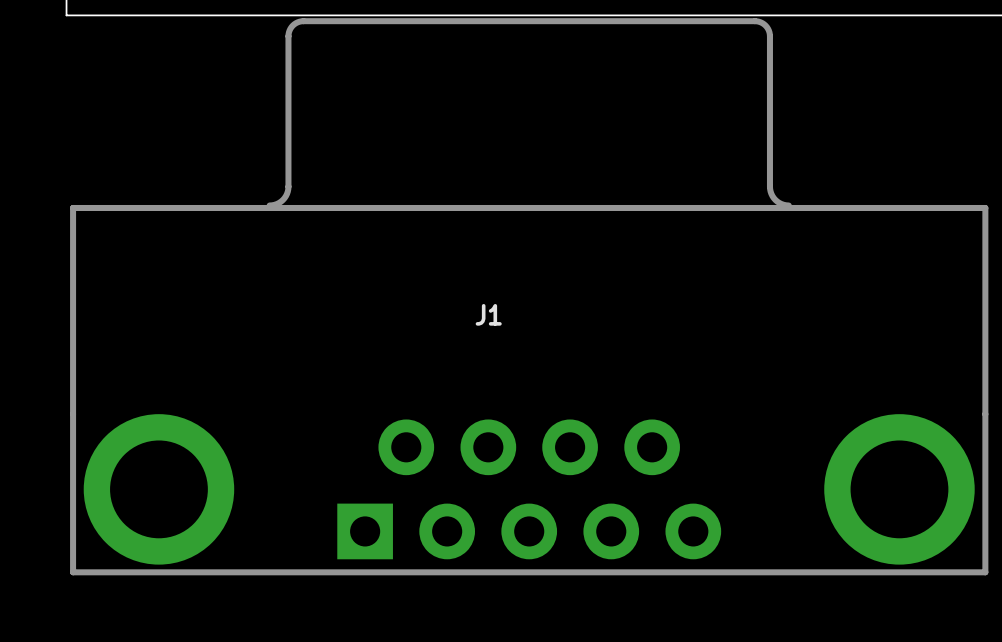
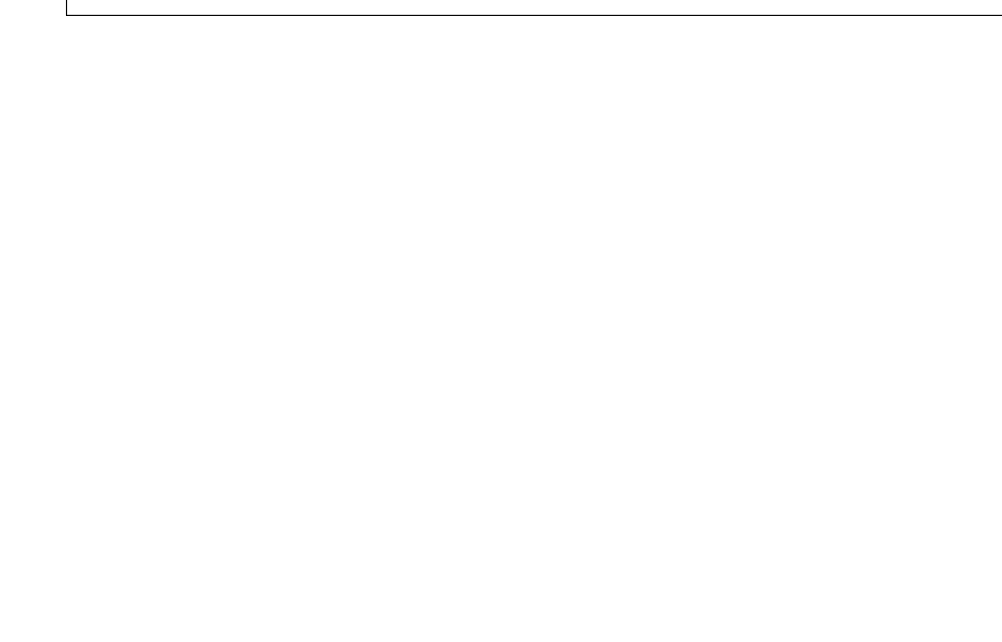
J1: (529, 296) -> none

